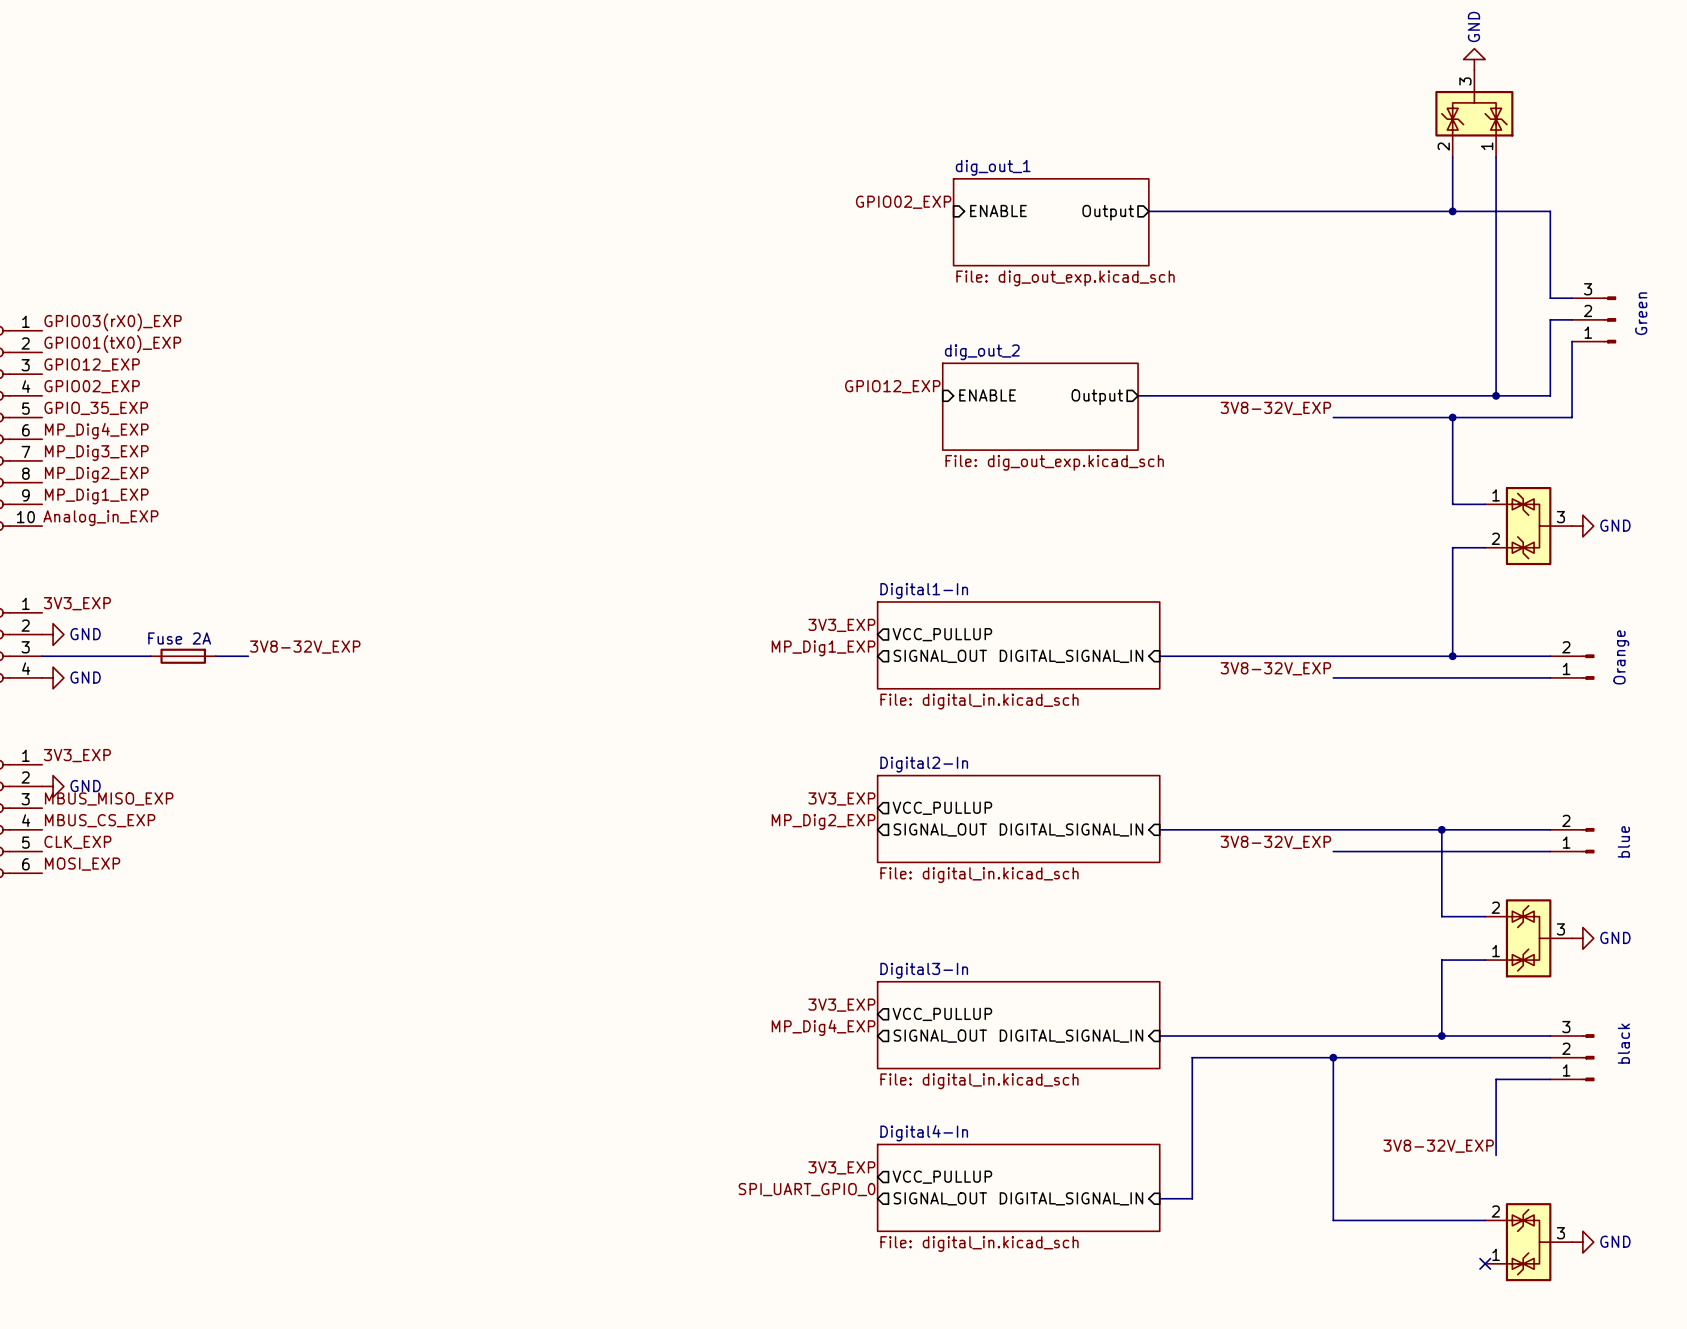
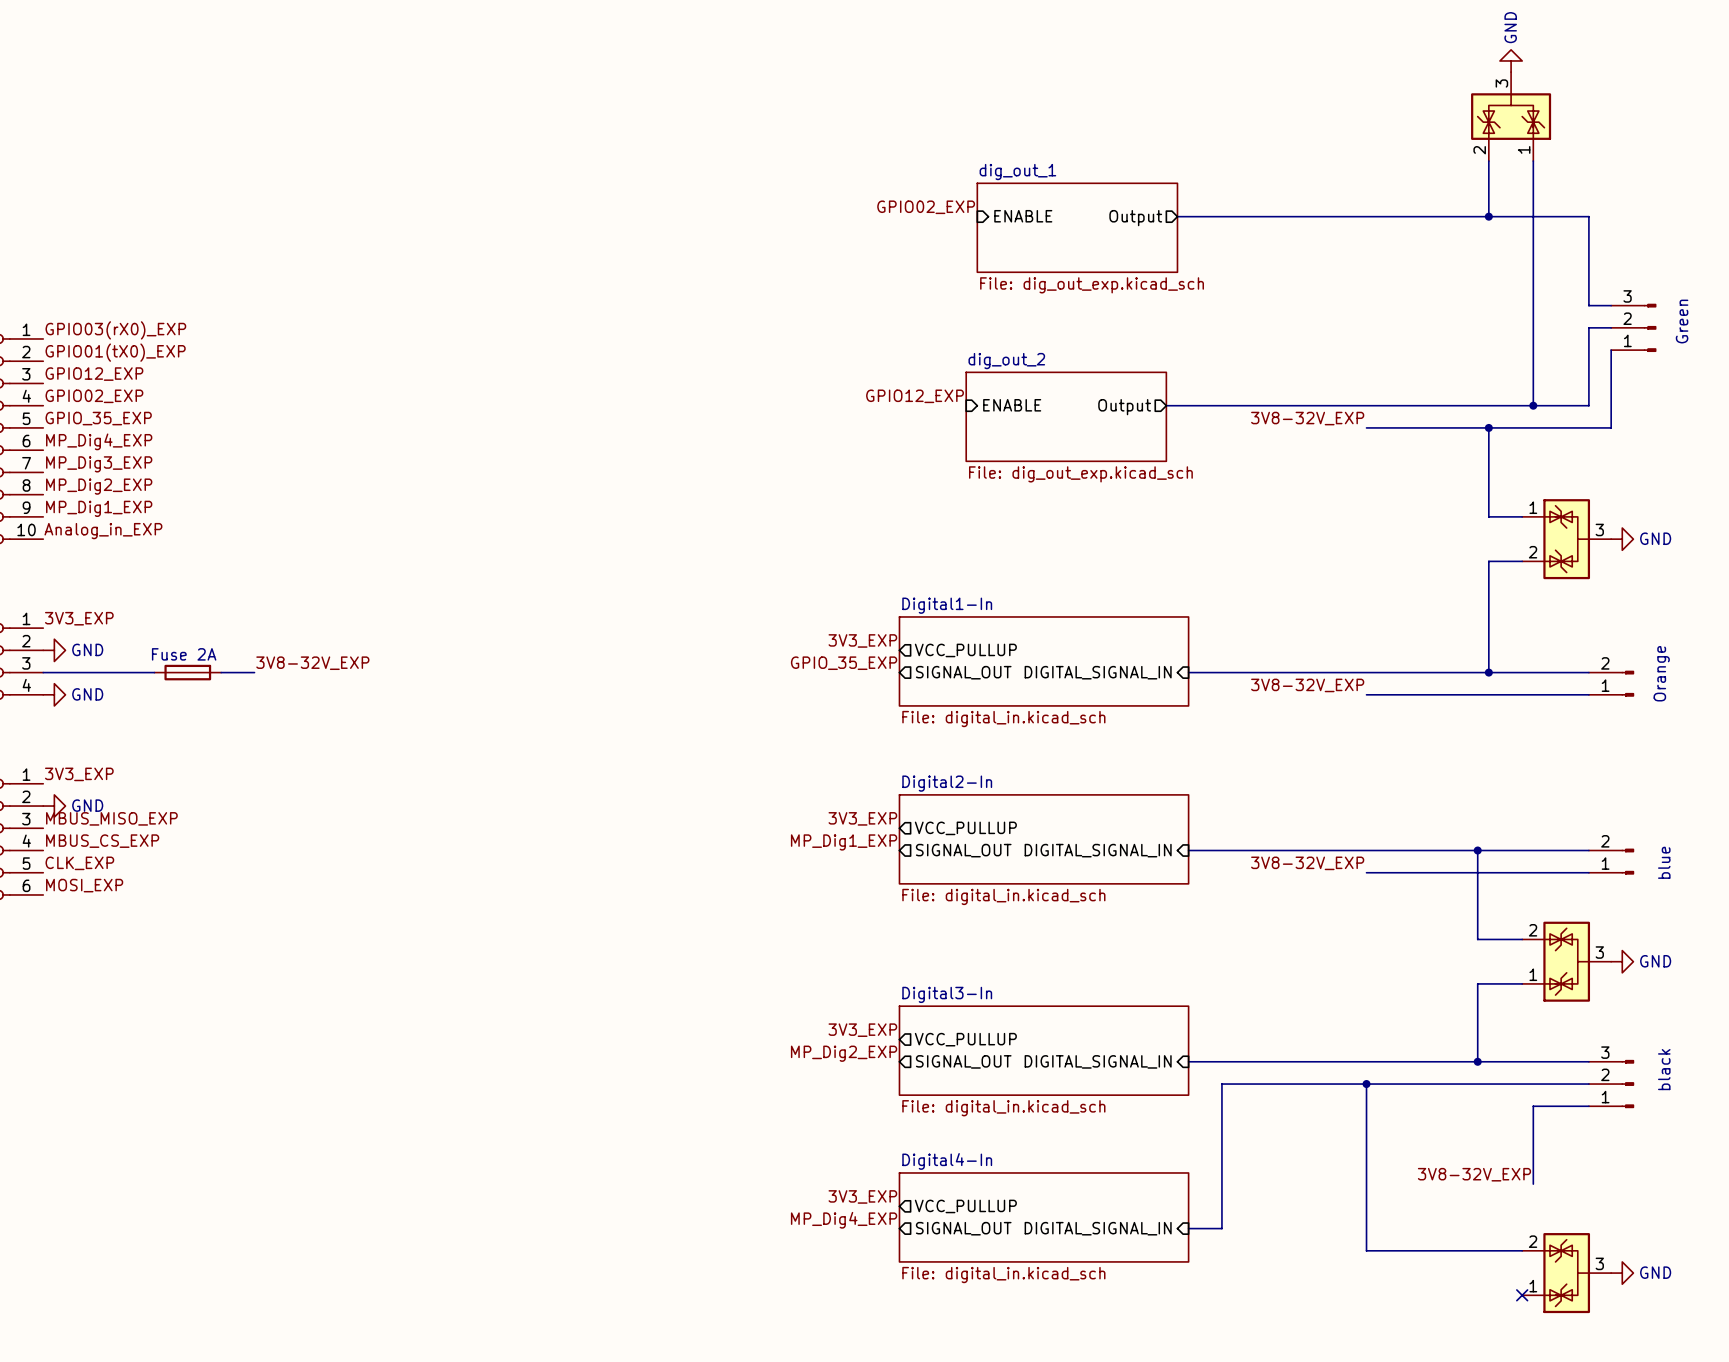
label: MP_Dig1_EXP (823, 648) -> GPIO_35_EXP (844, 663)
label: MP_Dig2_EXP (823, 821) -> MP_Dig1_EXP (844, 842)
label: MP_Dig4_EXP (823, 1027) -> MP_Dig2_EXP (844, 1053)
label: SPI_UART_GPIO_0 (807, 1189) -> MP_Dig4_EXP (844, 1220)

